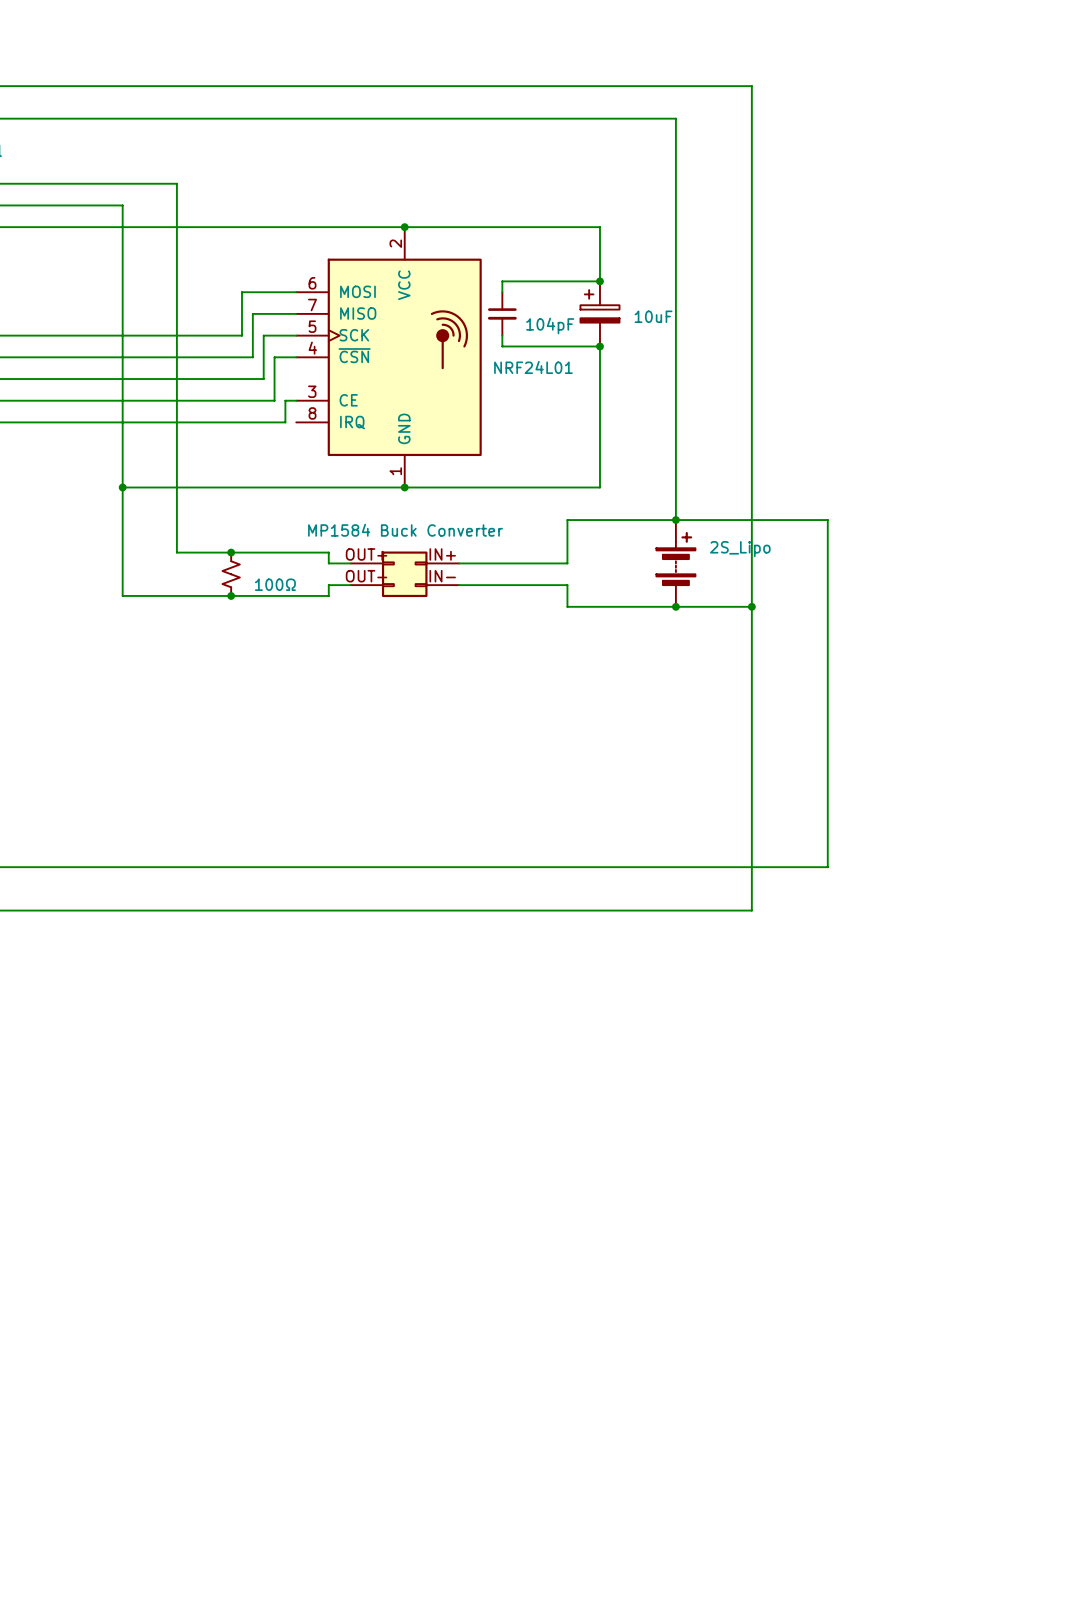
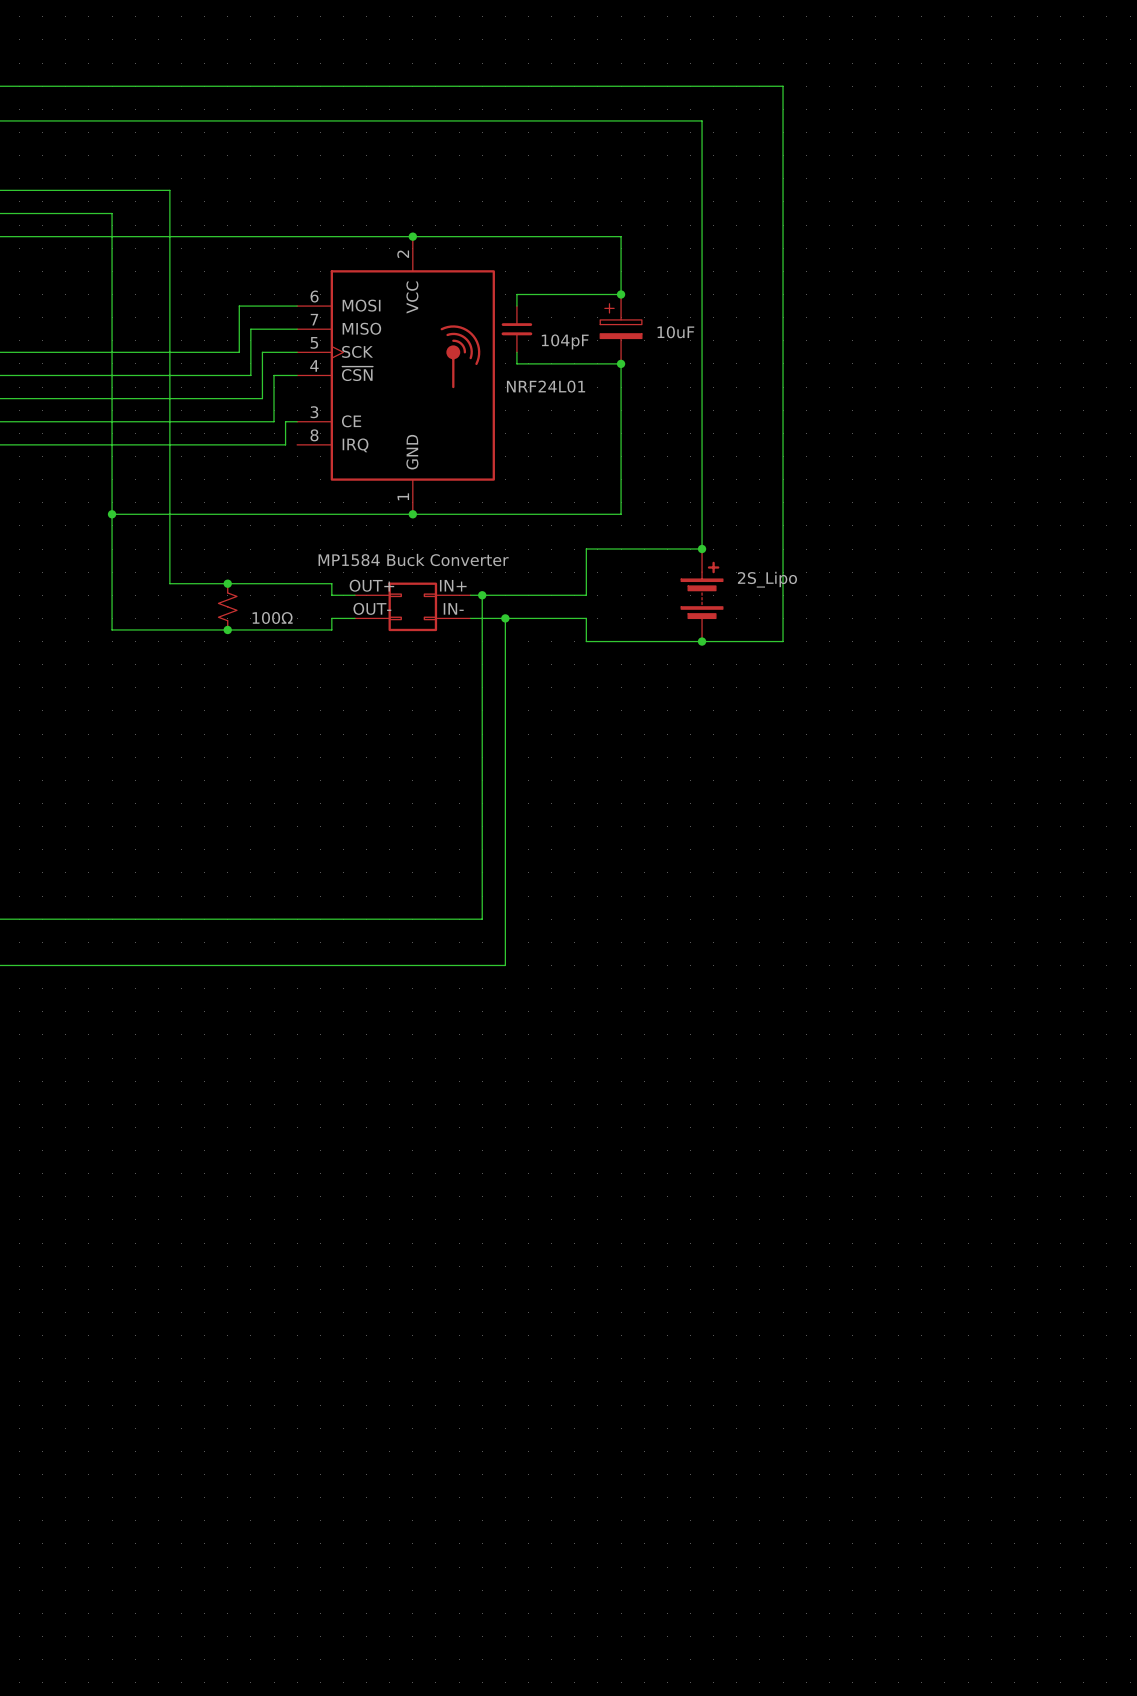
wire: (675, 520) (827, 520) (827, 867) (469, 867) -> (482, 595) (482, 919)
junction: none -> (482, 595)
junction: none -> (505, 618)
wire: (751, 606) (751, 910) (491, 910) -> (505, 618) (505, 965)
junction: (751, 606) -> none

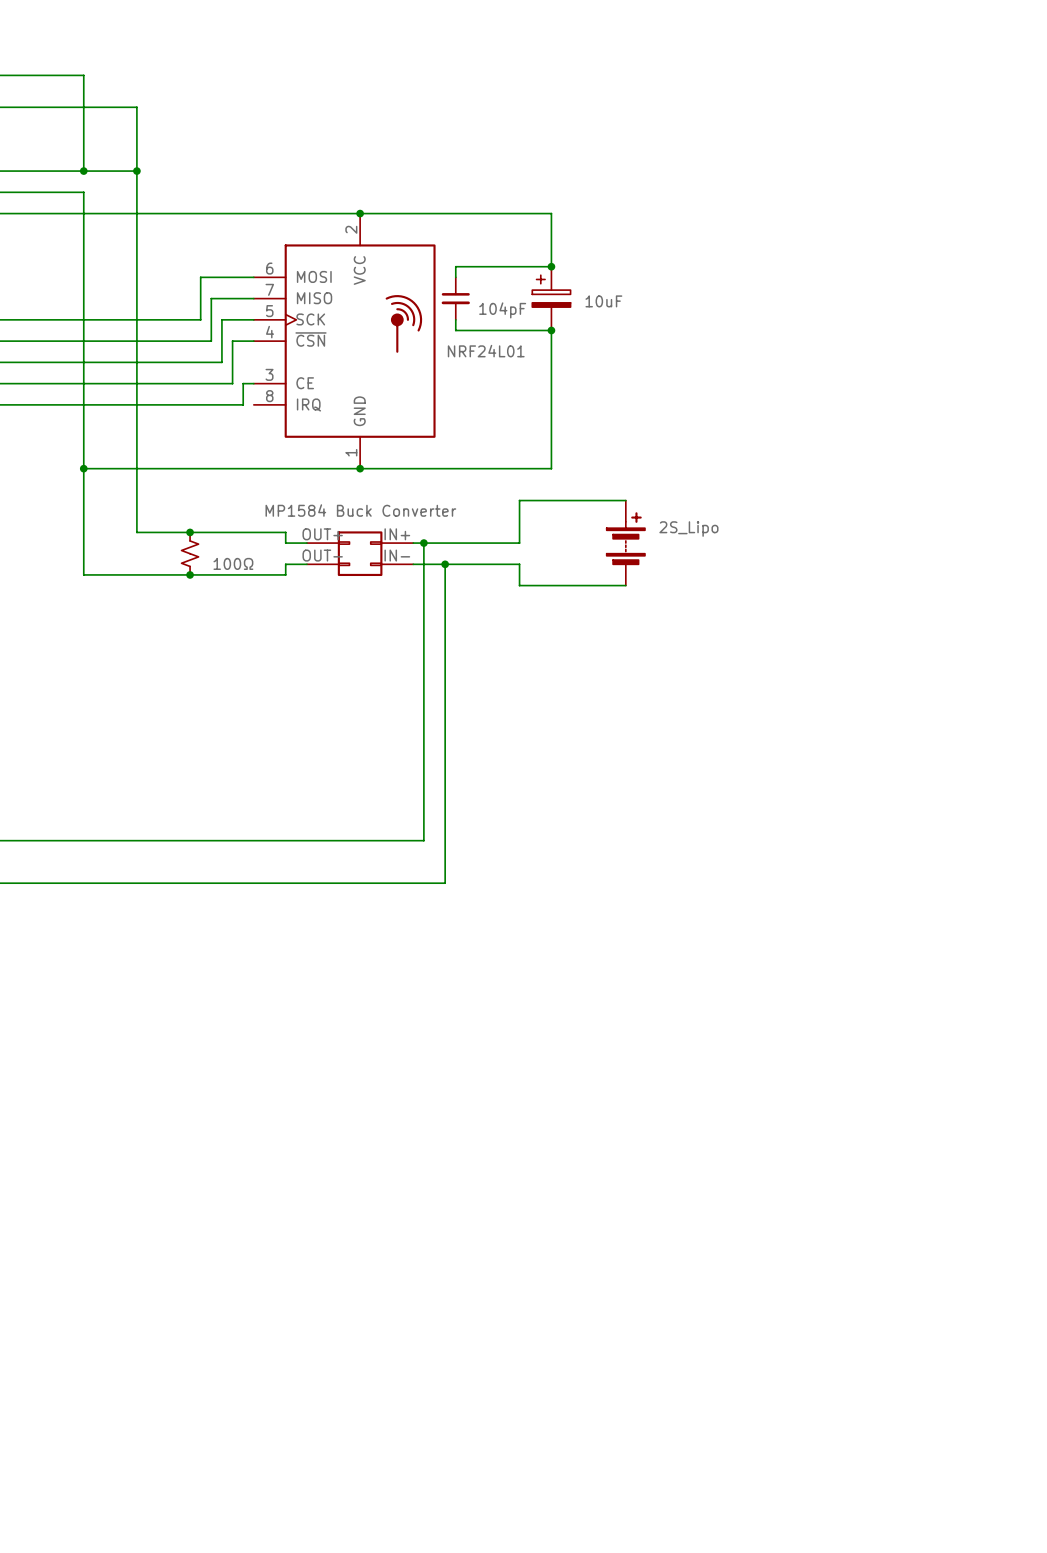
wire: (112, 86) (783, 86) (783, 641) (702, 641) -> (83, 75) (83, 171)
wire: (169, 120) (702, 120) (702, 549) -> (136, 107) (136, 171)
junction: none -> (83, 171)
junction: none -> (136, 171)
junction: (702, 549) -> none
junction: (702, 641) -> none

